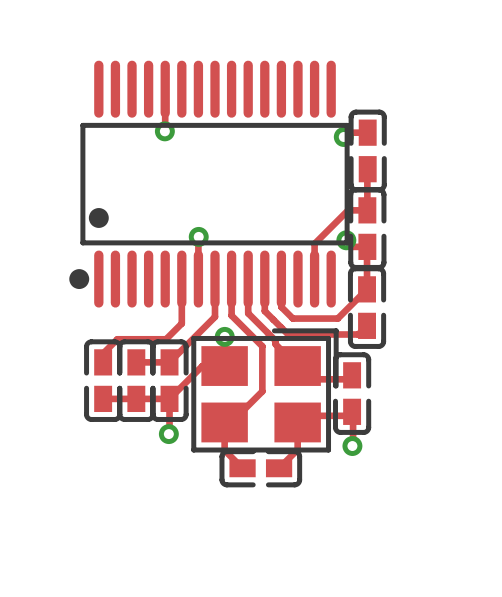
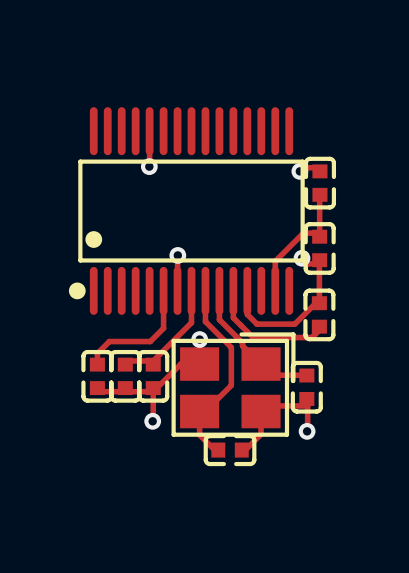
part footprint: [348, 109, 387, 193] -> [303, 156, 337, 210]
part footprint: [348, 187, 387, 270] -> [303, 222, 336, 275]
part footprint: [347, 266, 387, 349] -> [303, 288, 336, 342]
part footprint: [84, 339, 123, 422] -> [81, 349, 114, 403]
part footprint: [117, 339, 156, 422] -> [109, 349, 142, 403]
part footprint: [150, 339, 189, 422] -> [137, 349, 170, 403]
part footprint: [333, 352, 372, 435] -> [290, 360, 323, 414]
part footprint: [219, 449, 303, 488] -> [203, 434, 257, 467]

